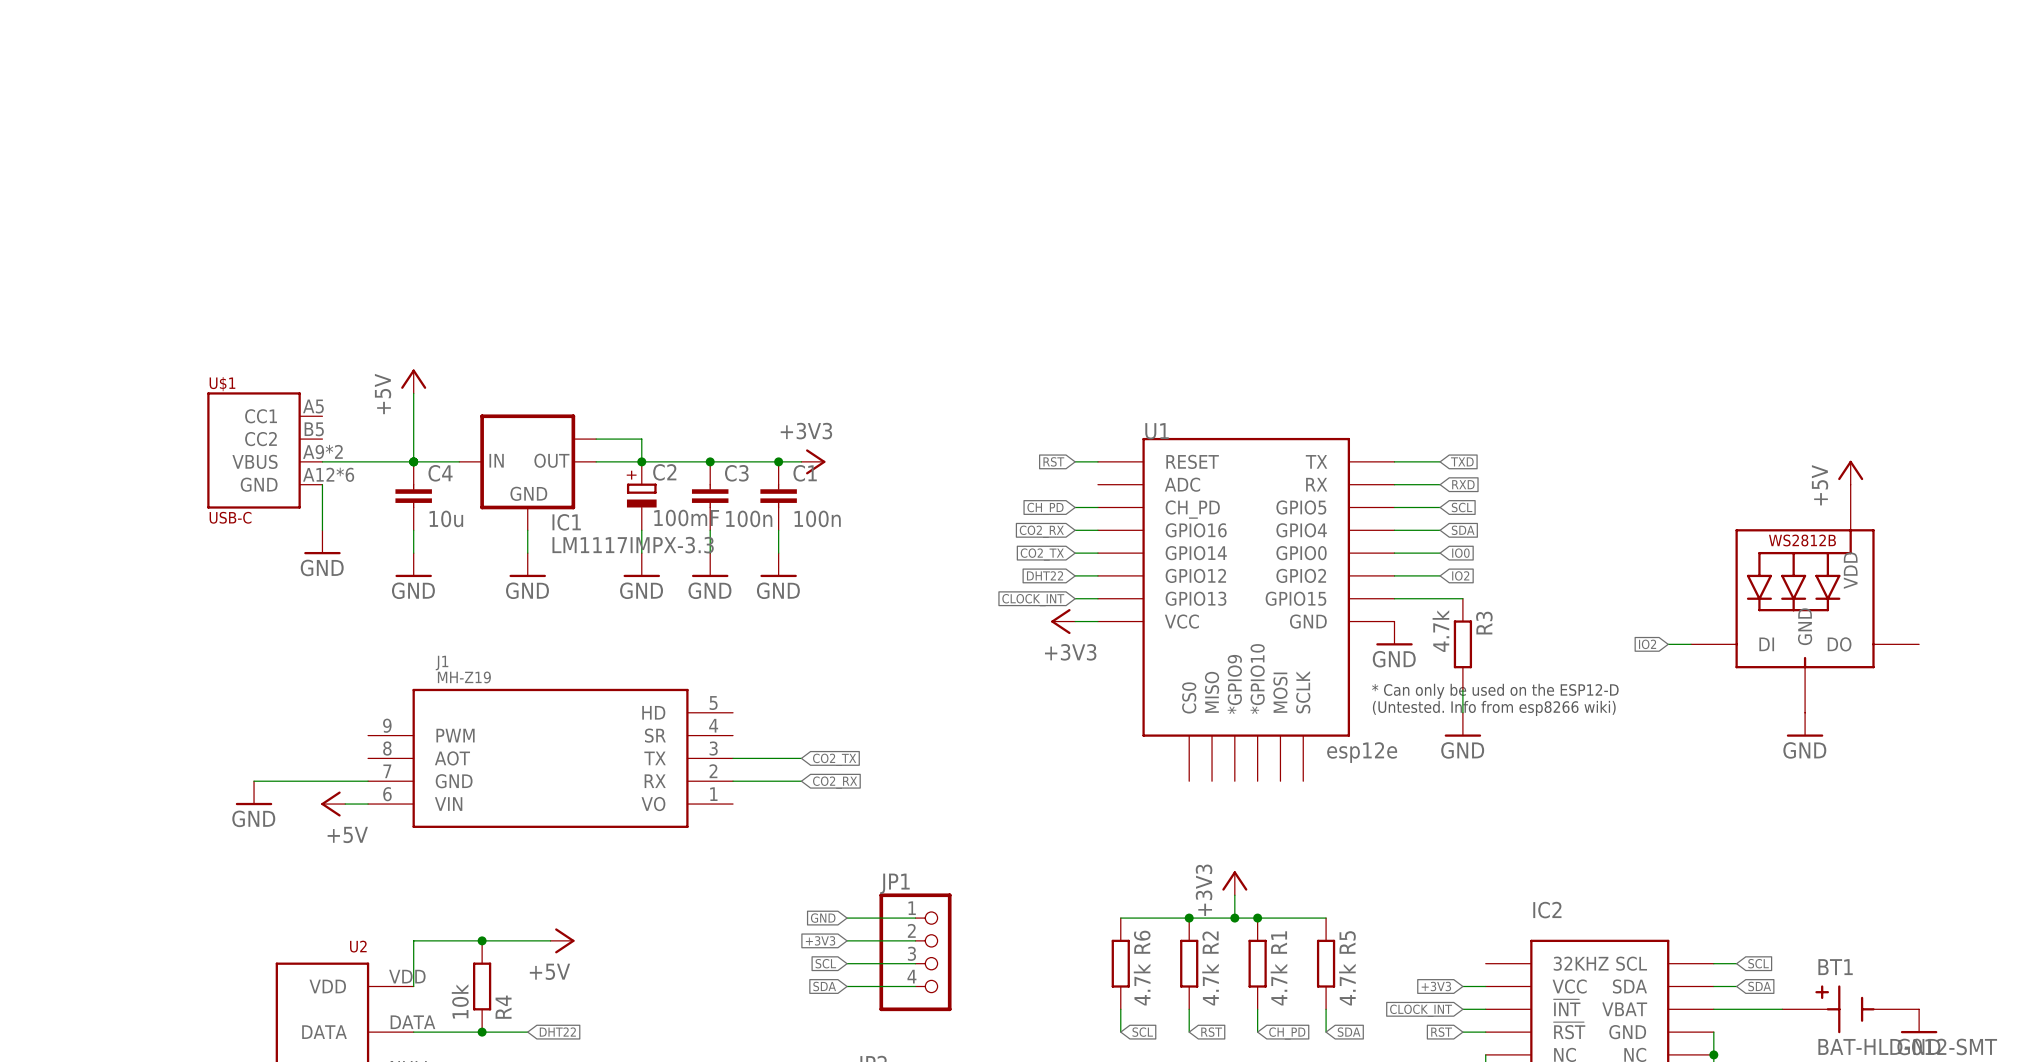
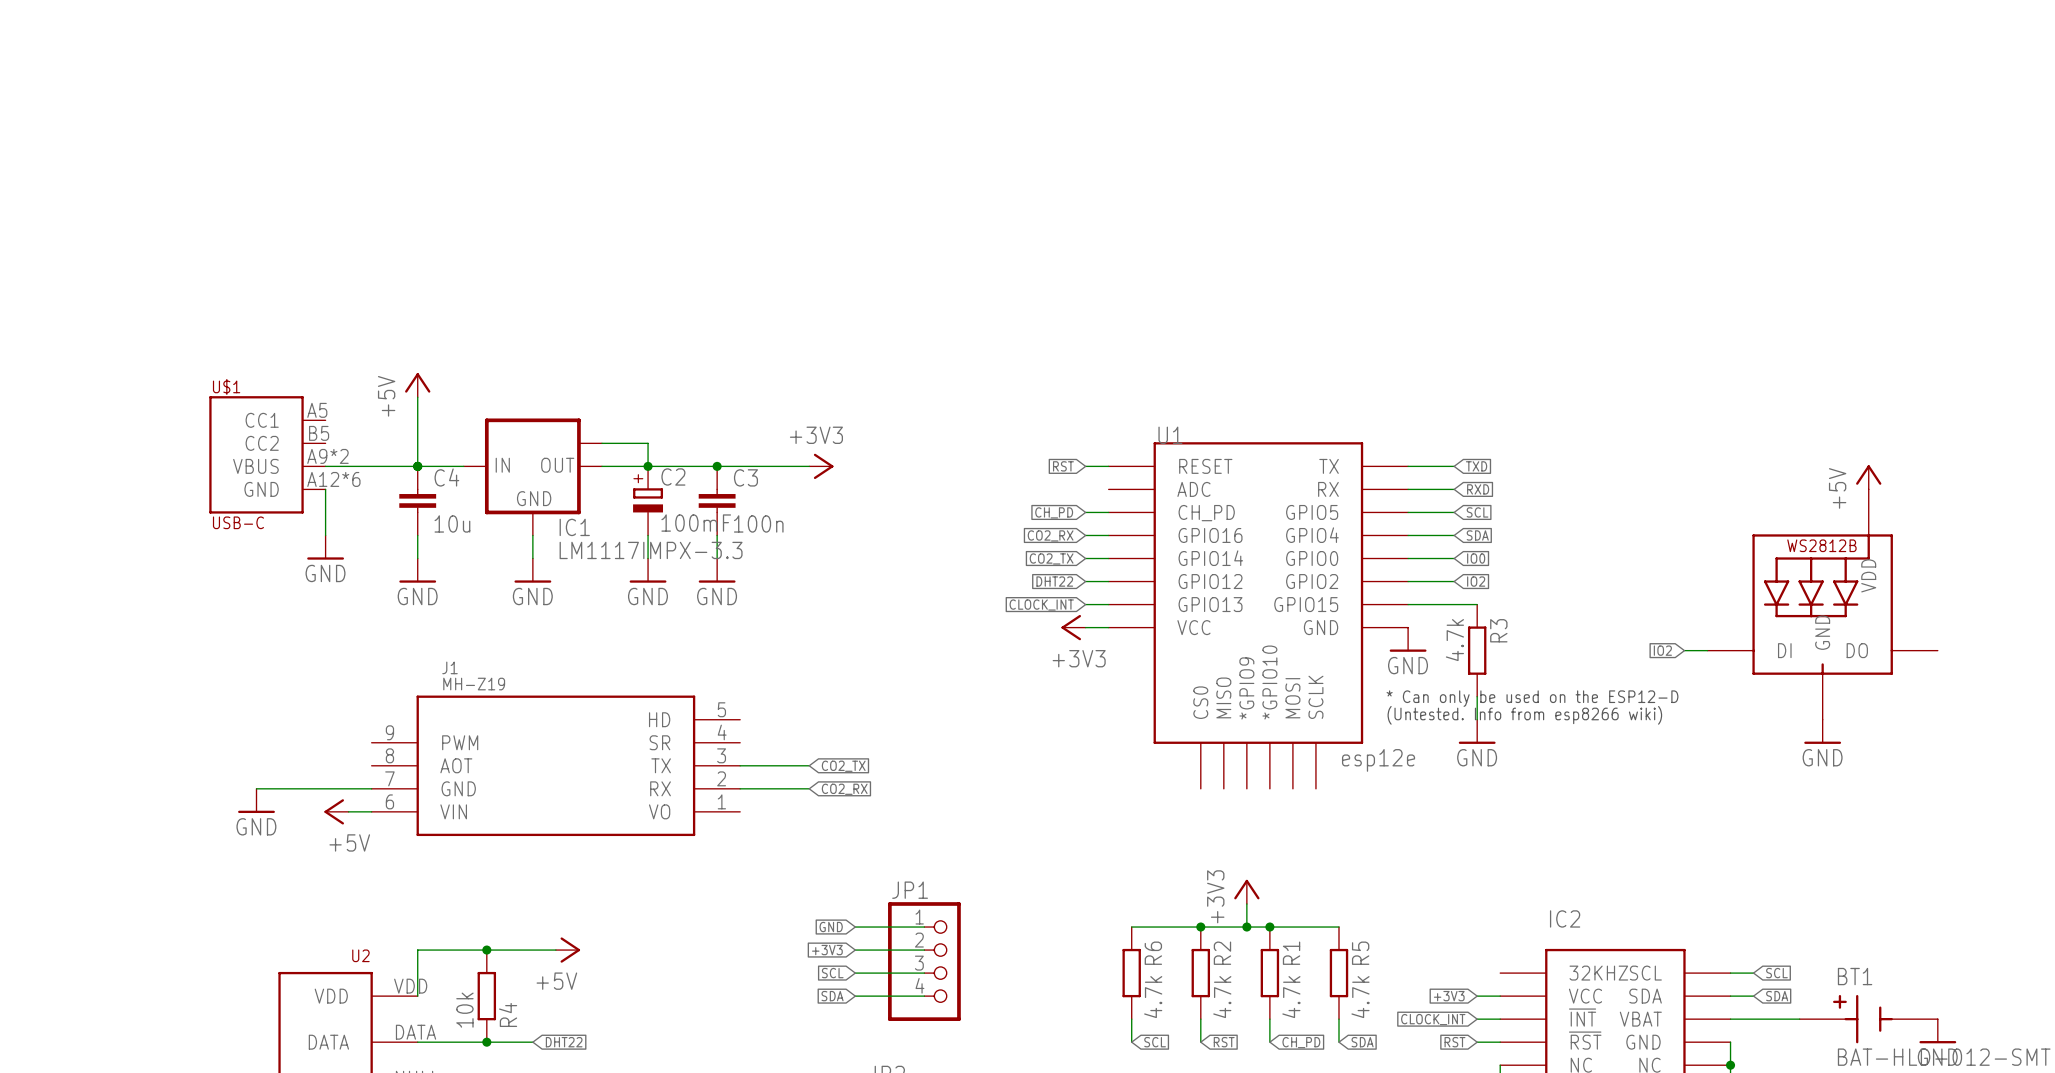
junction: (778, 461) -> none
C1: 100n (778, 496) -> none
wire: (778, 530) (778, 553) -> none
power symbol: GND (778, 565) -> none

